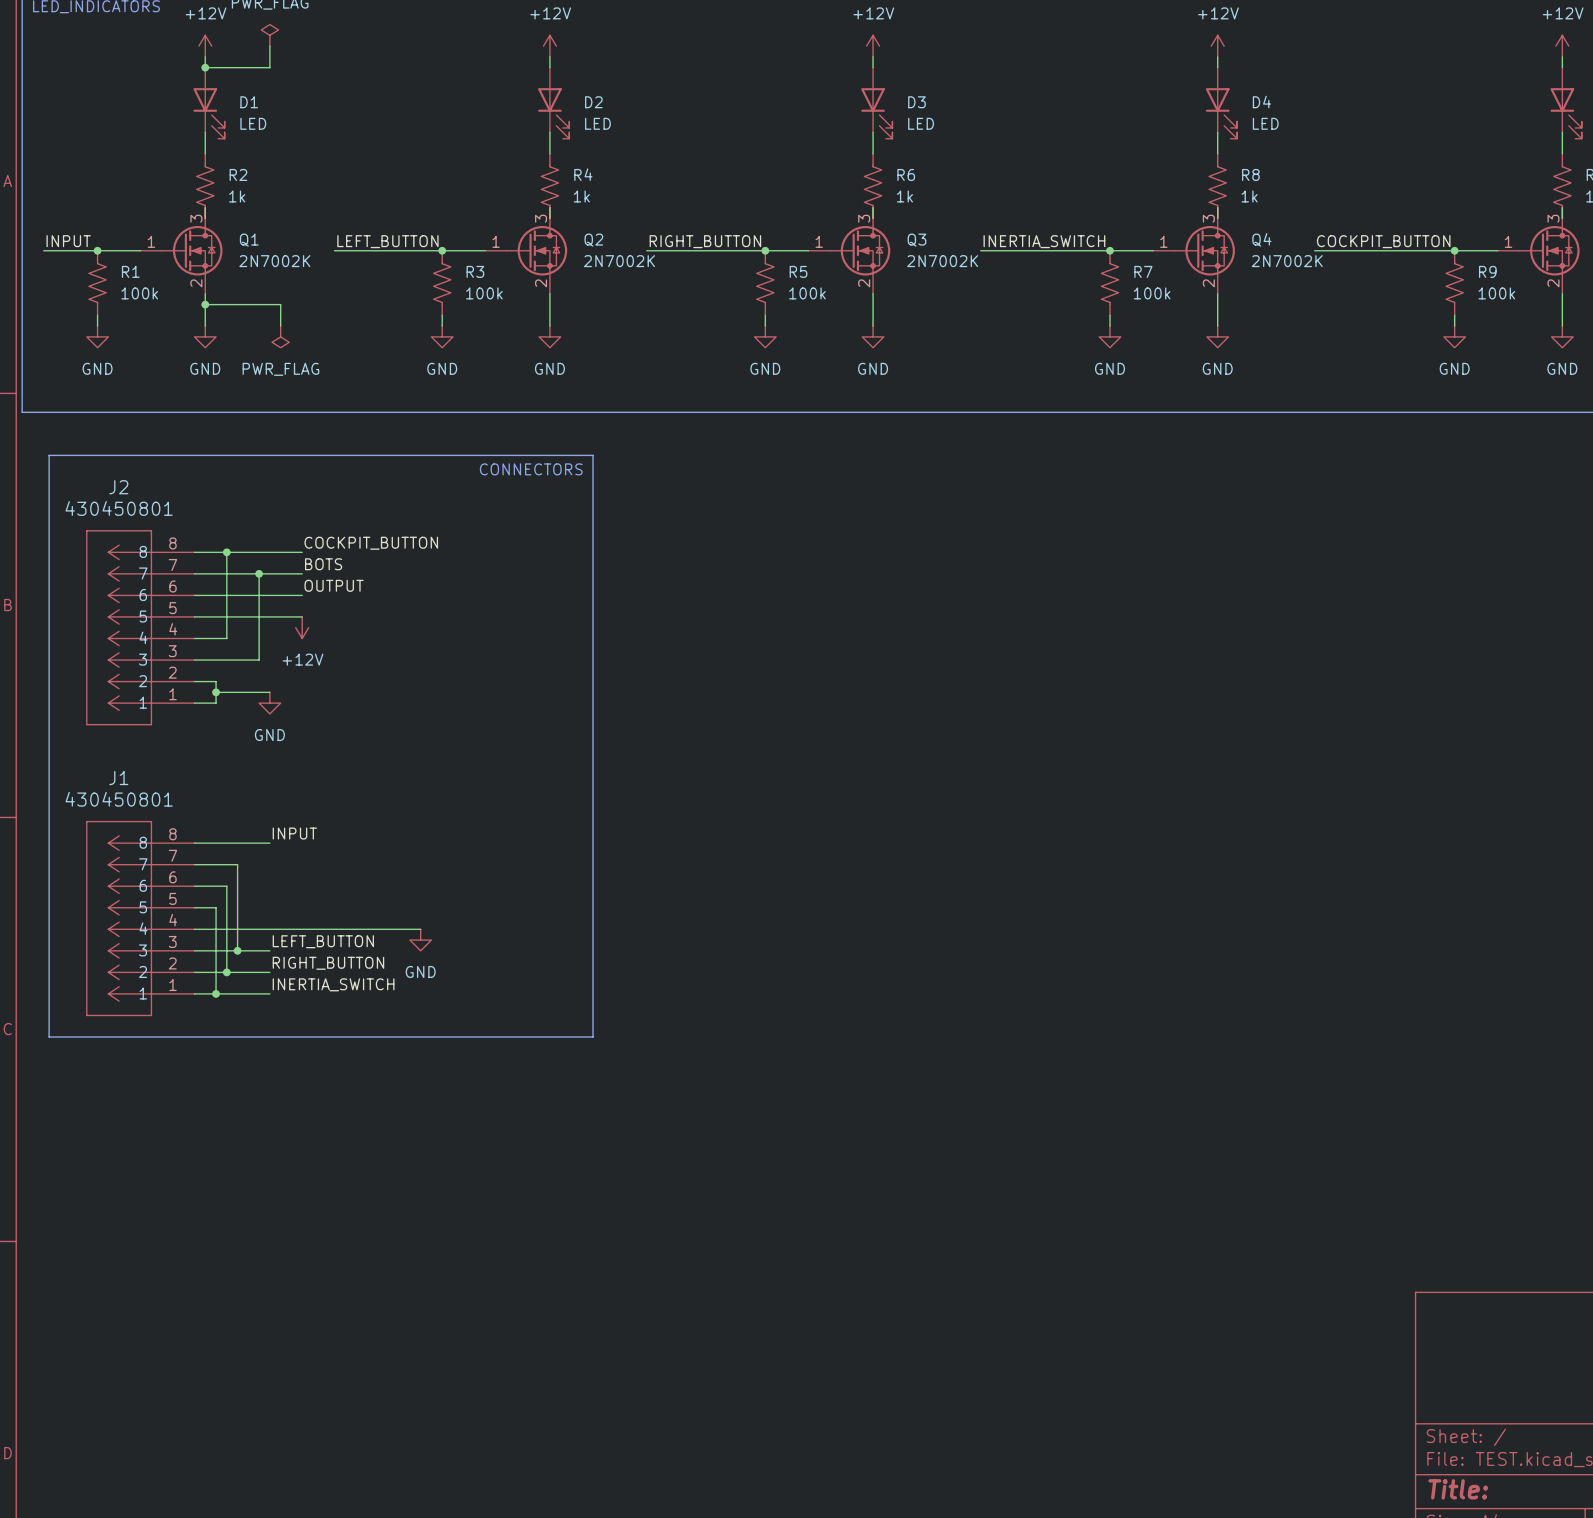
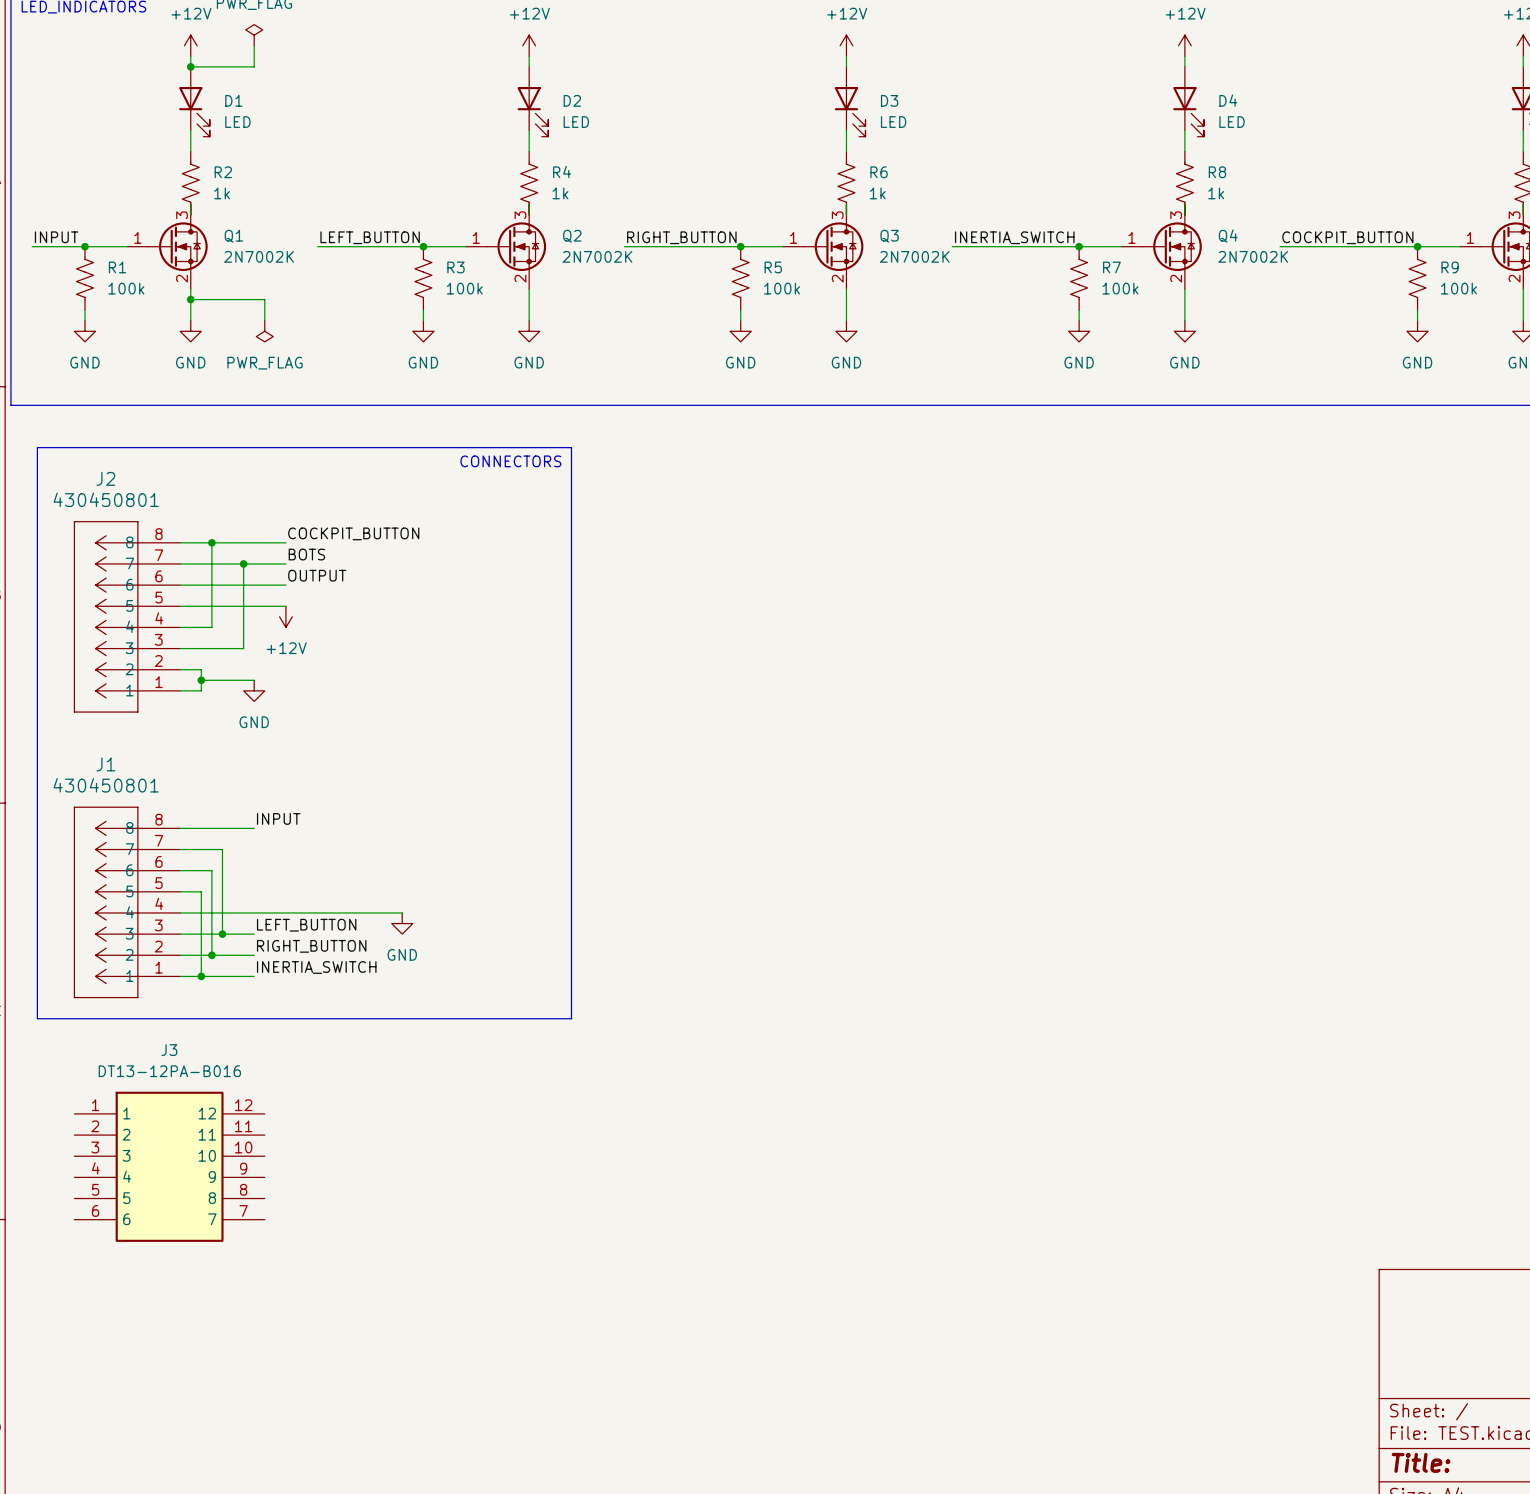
J3: none -> DT13-12PA-B016 (169, 1166)

